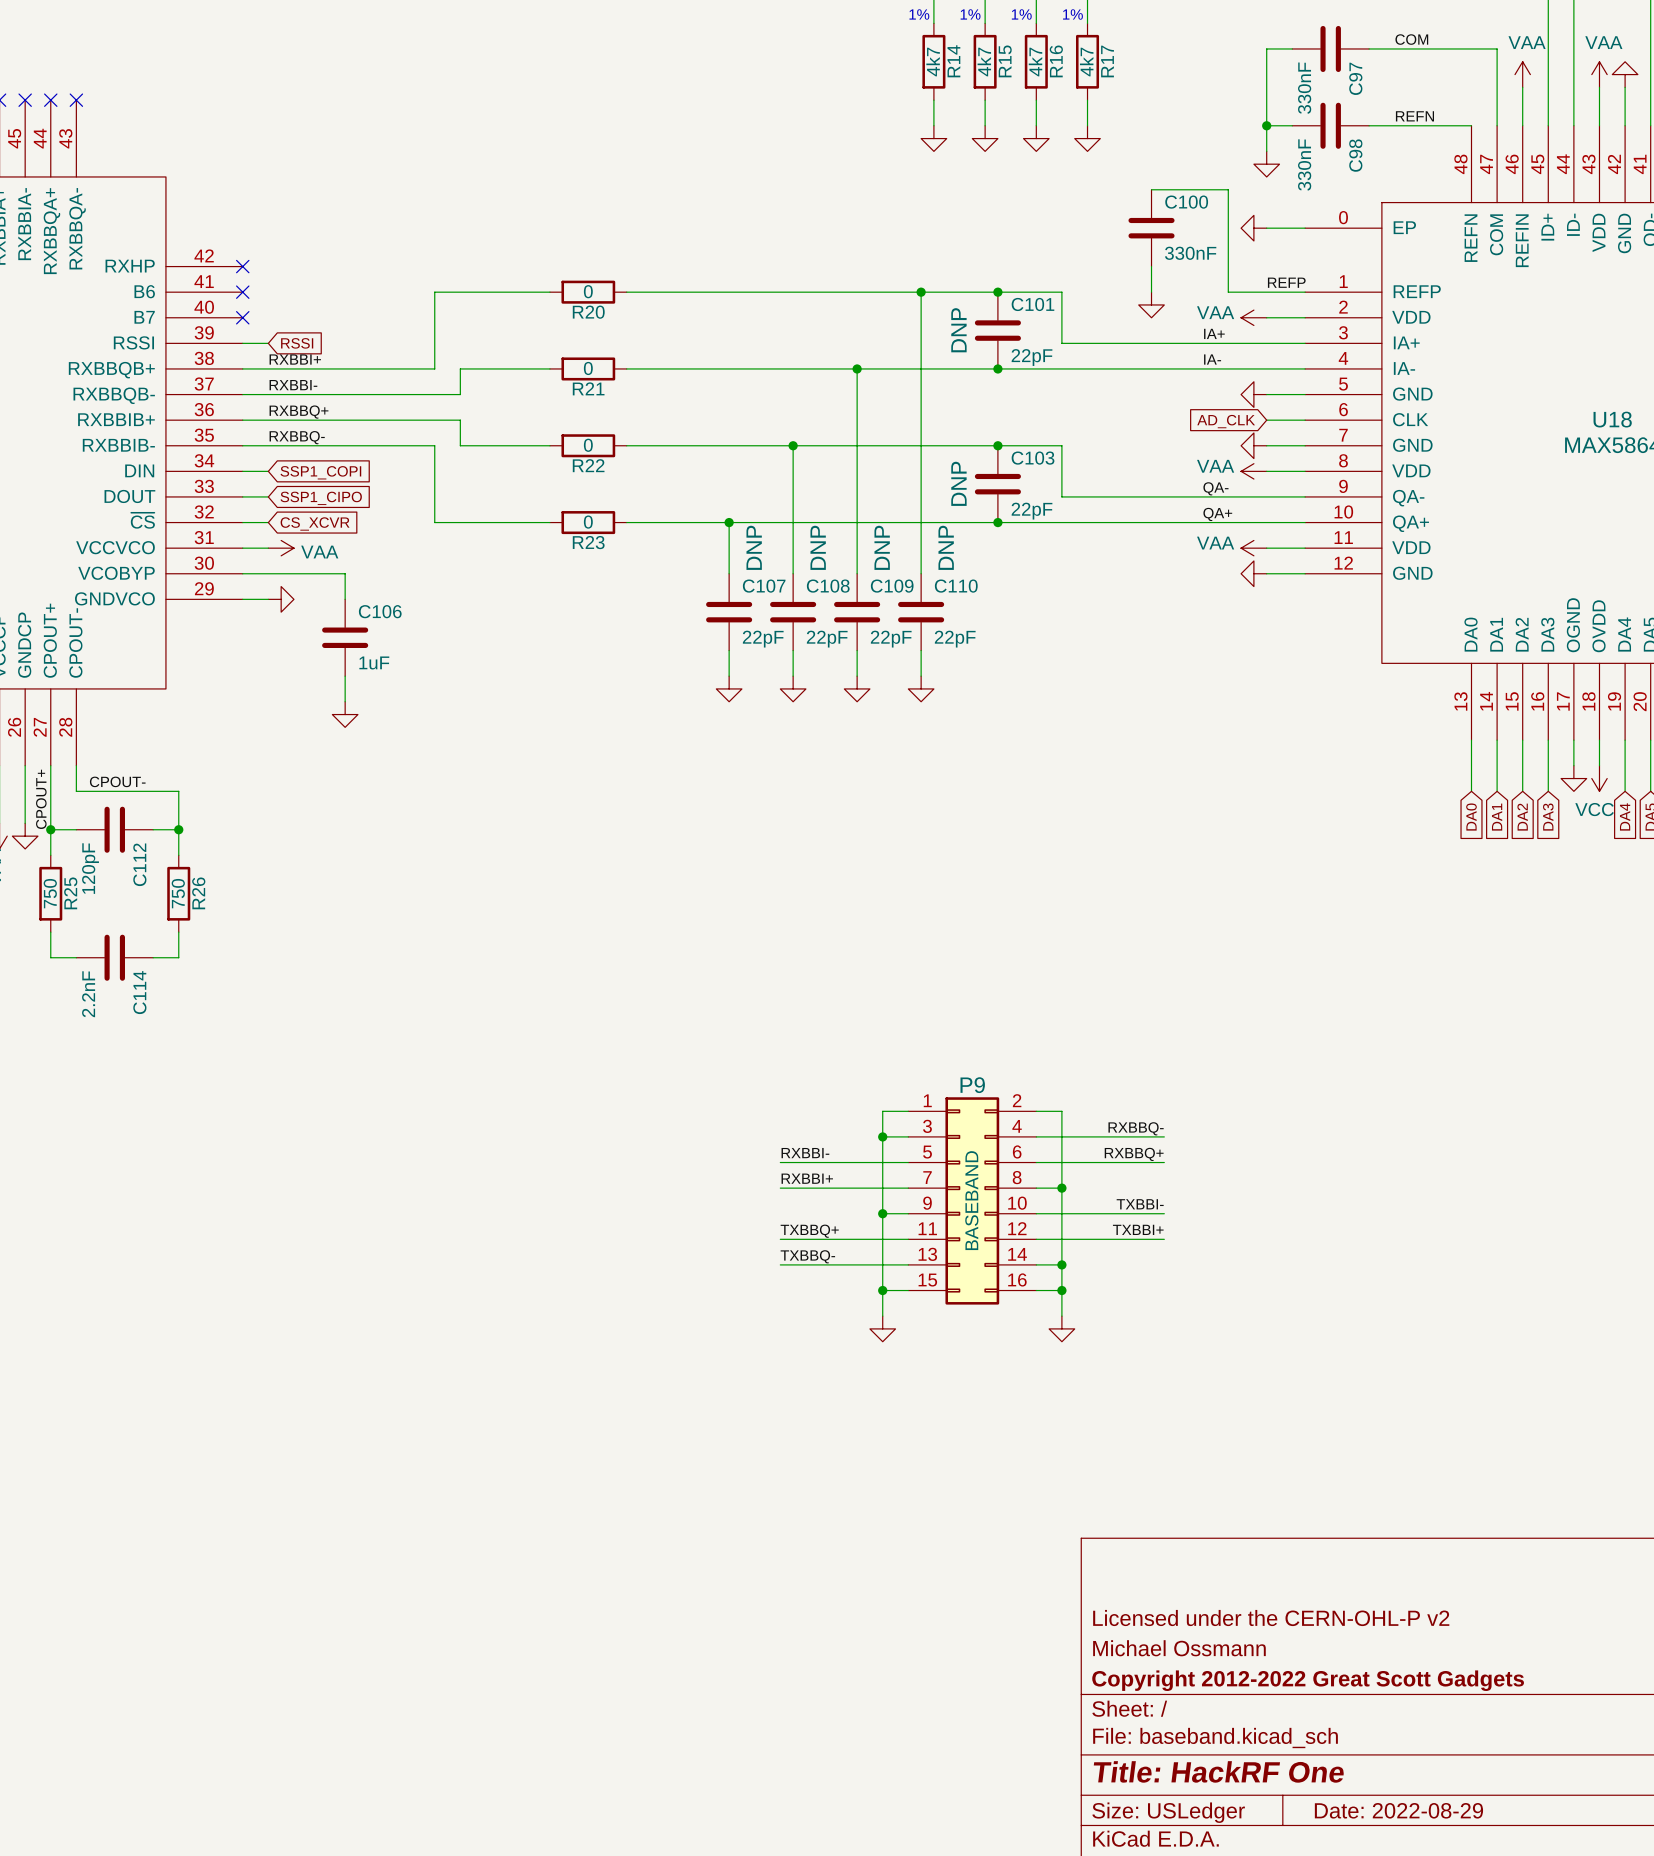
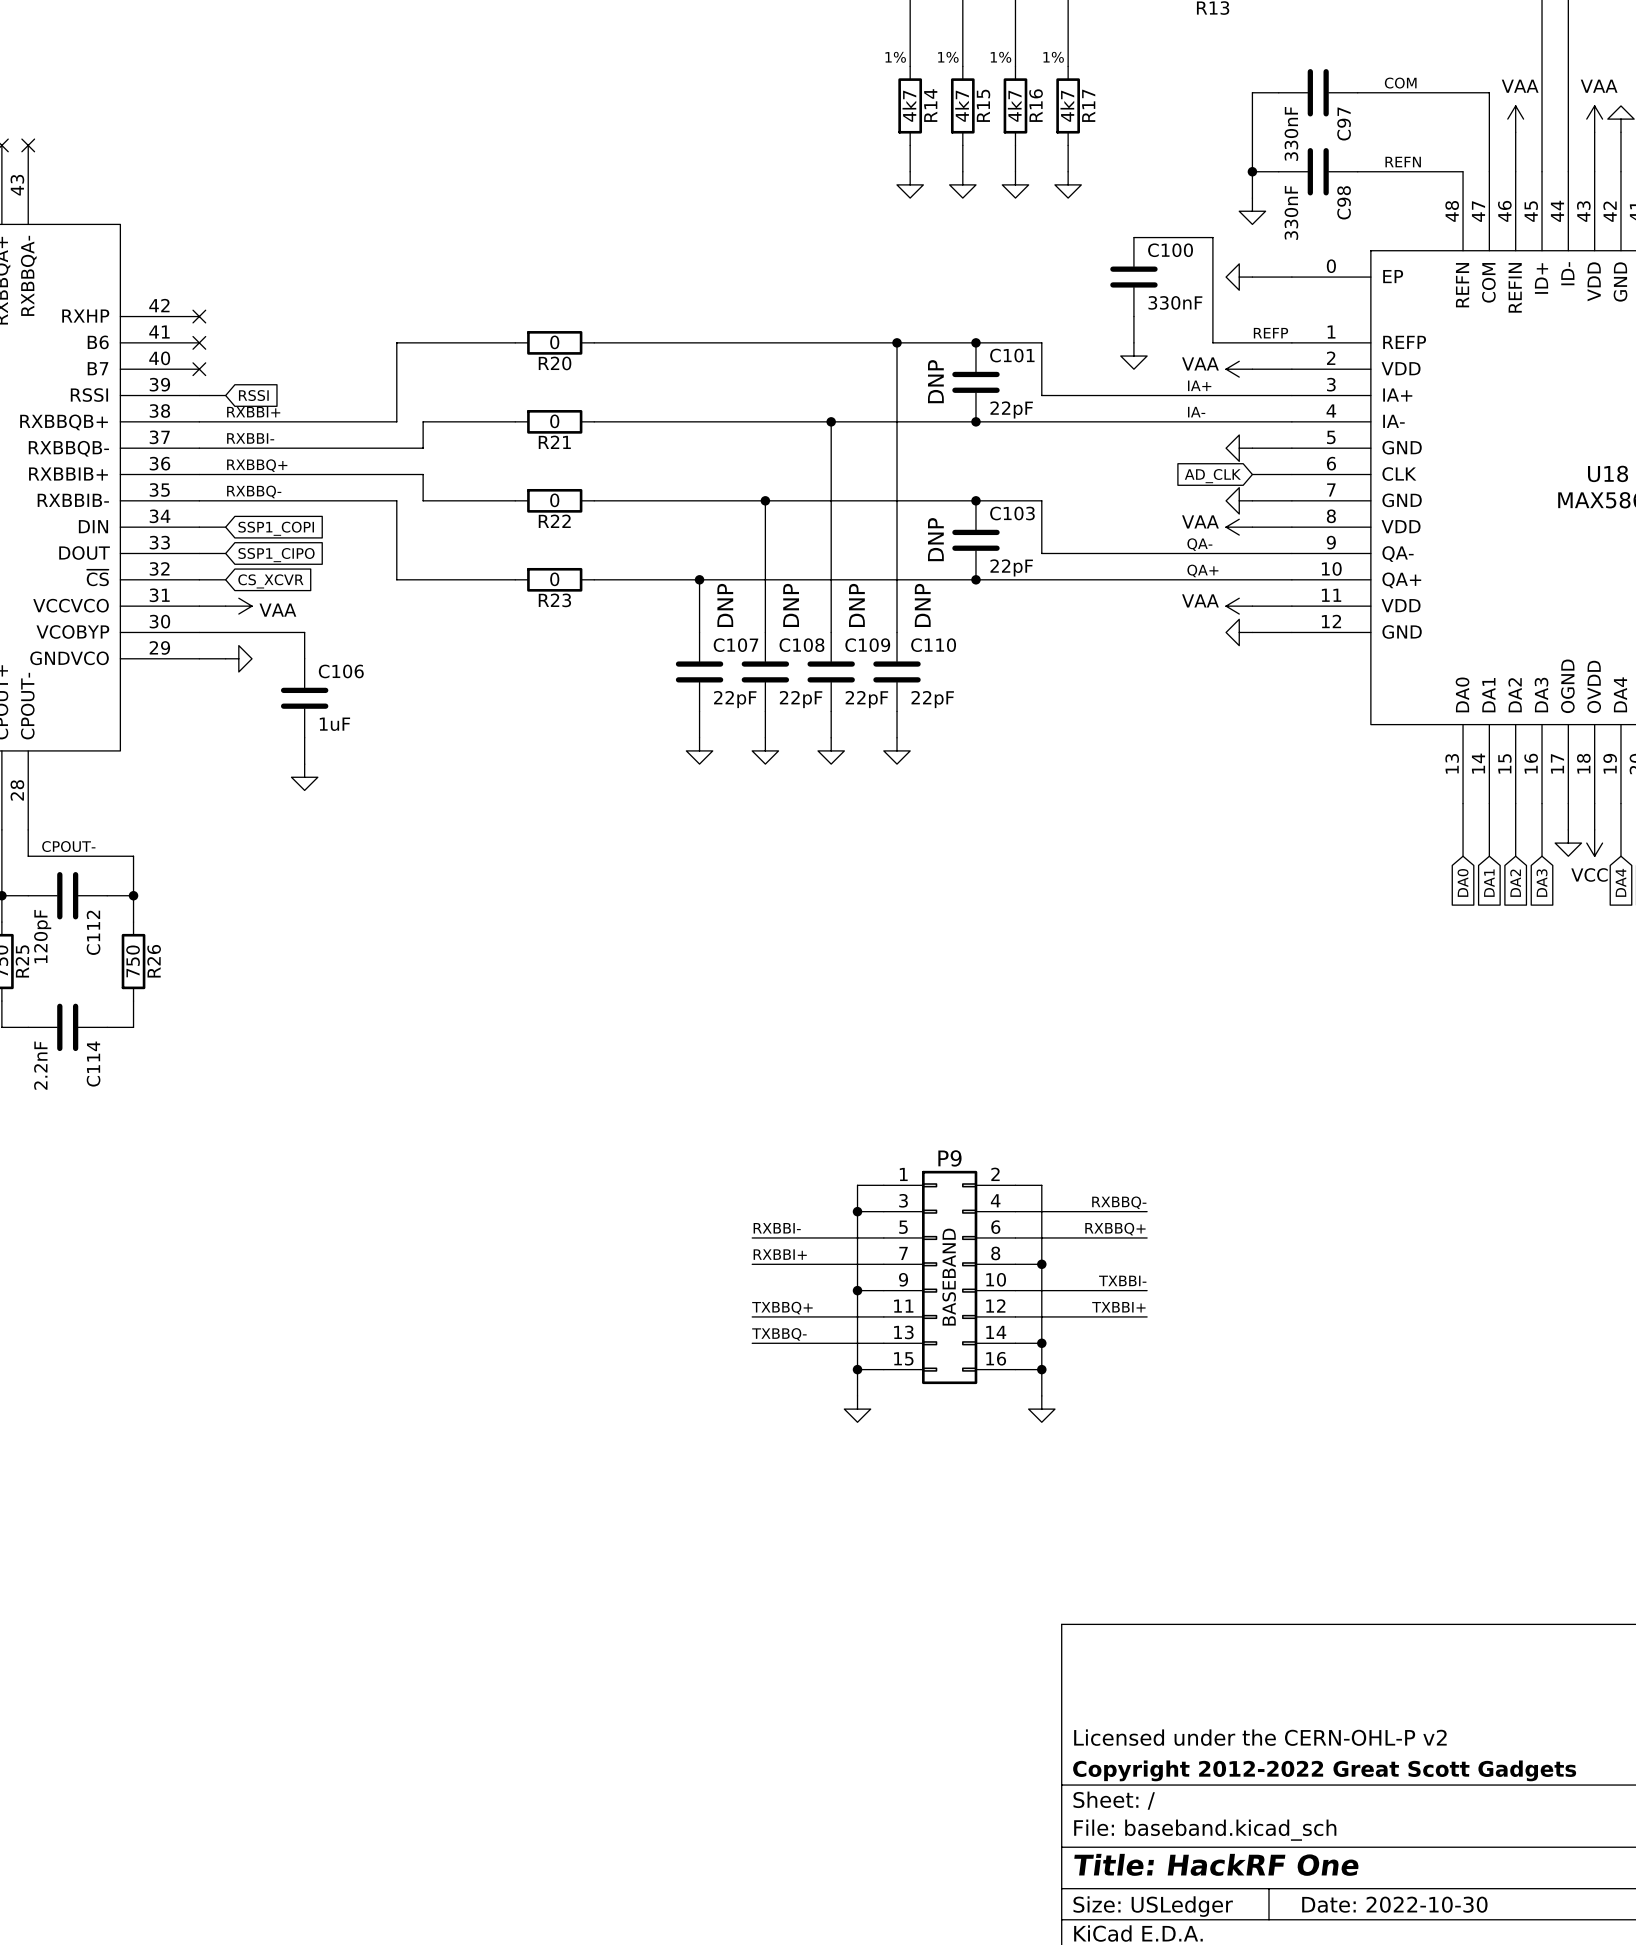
title block: Licensed under the CERN-OHL-P v2 (1271, 1618) -> none
title block: Michael Ossmann (1179, 1648) -> Licensed under the CERN-OHL-P v2 (1260, 1737)
title block: Date: 2022-08-29 (1398, 1810) -> Date: 2022-10-30 (1394, 1904)

